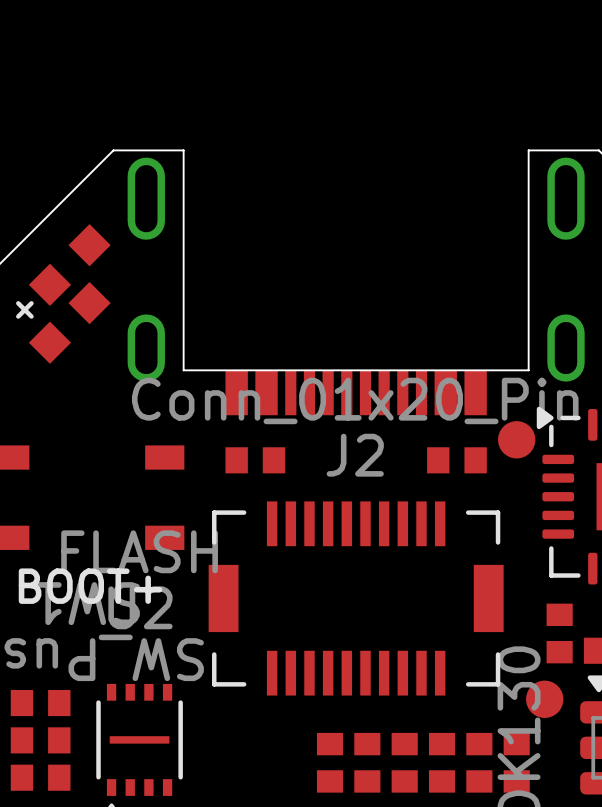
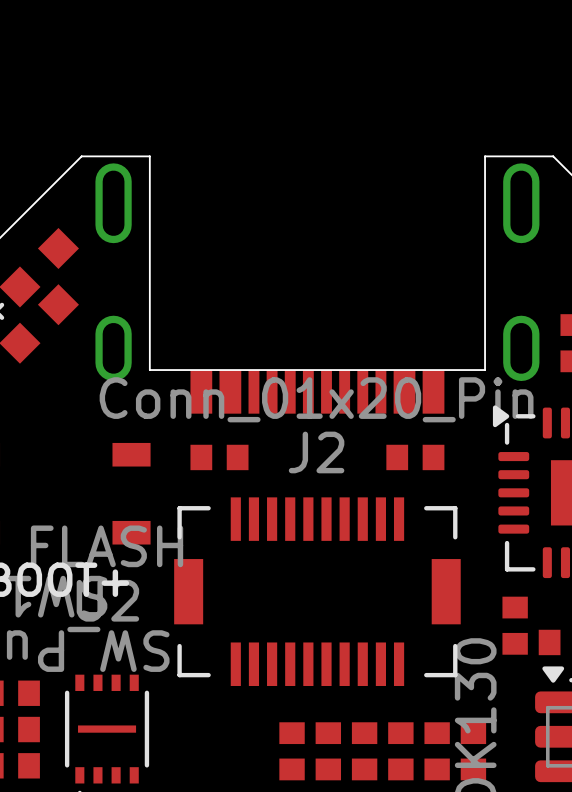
part: (516, 439) -> none
part: (544, 699) -> none

